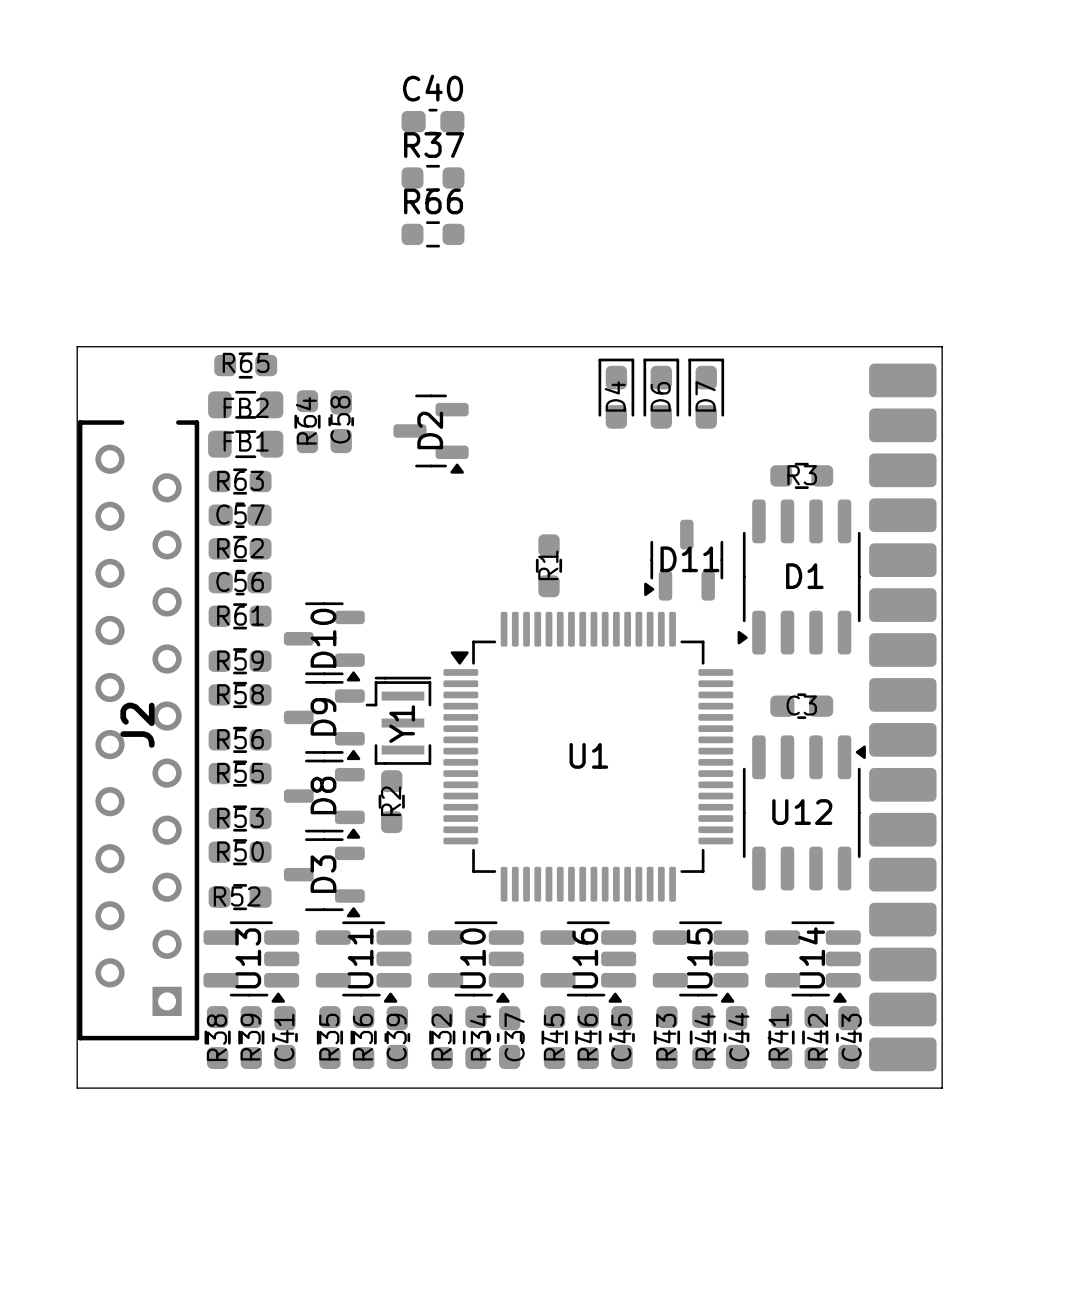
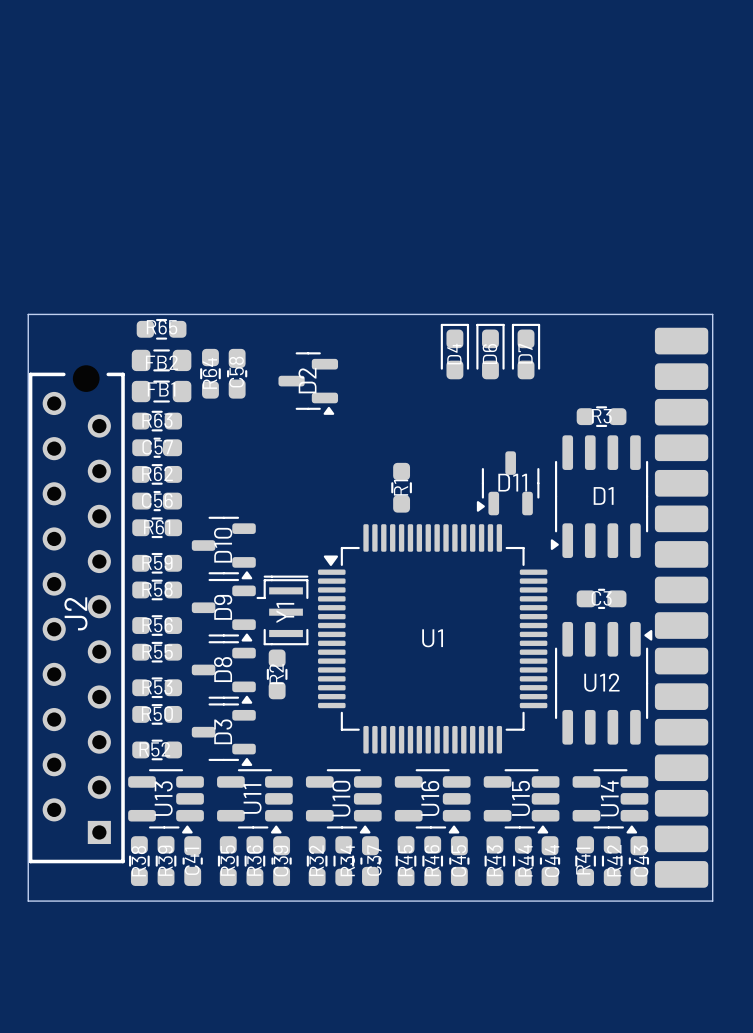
C40: (433, 121) -> none
R37: (433, 178) -> none
R66: (433, 234) -> none

